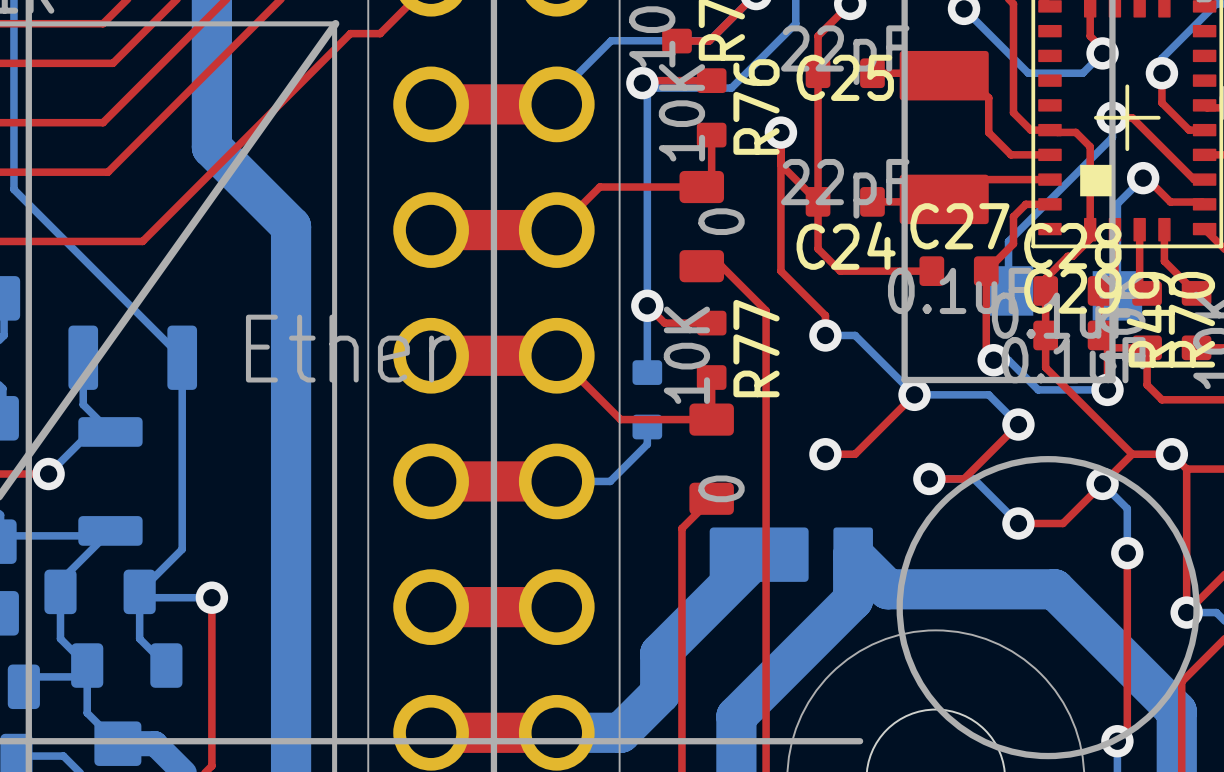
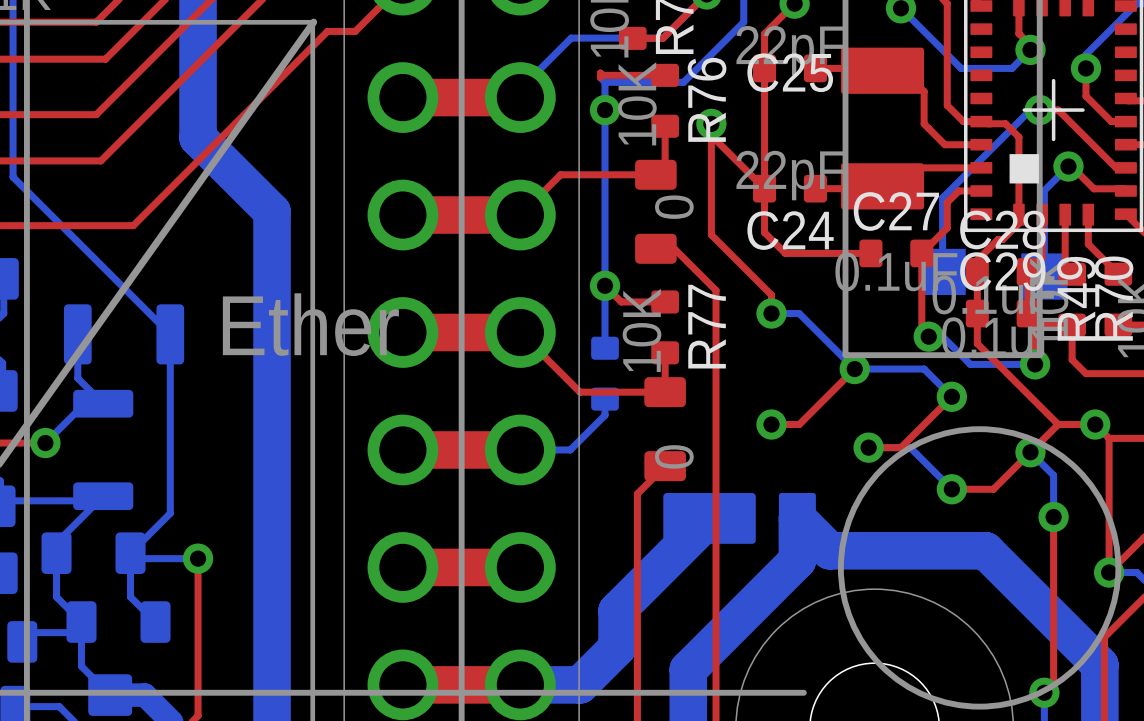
via position: (642, 83) -> (605, 110)
bottom track: (1112, 117) (1112, 137) (1008, 241) -> (1039, 110) (1030, 110) (942, 197) (942, 225)
top track: (780, 132) (780, 271) -> (711, 123) (711, 234) (729, 253)
via position: (780, 132) -> (711, 123)
top track: none -> (711, 135) (729, 153)

